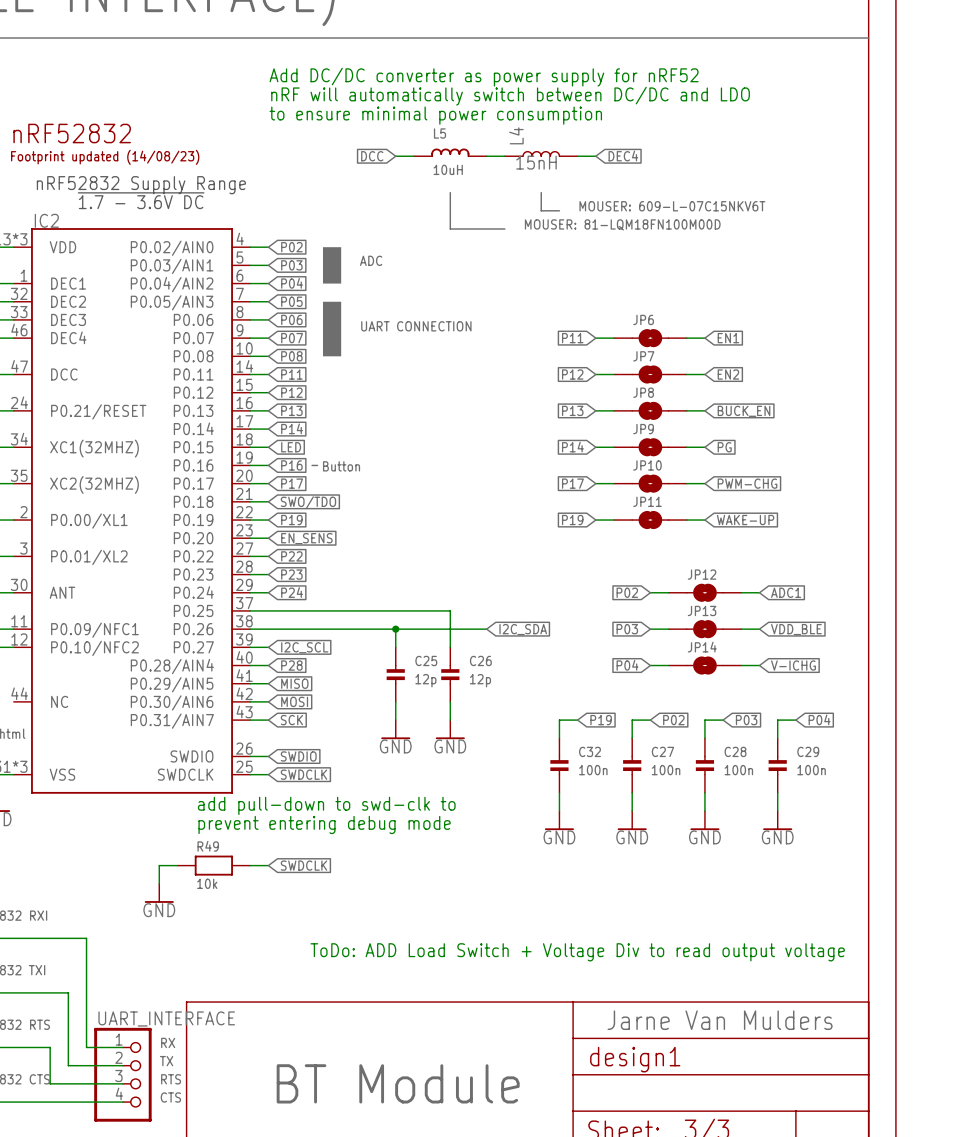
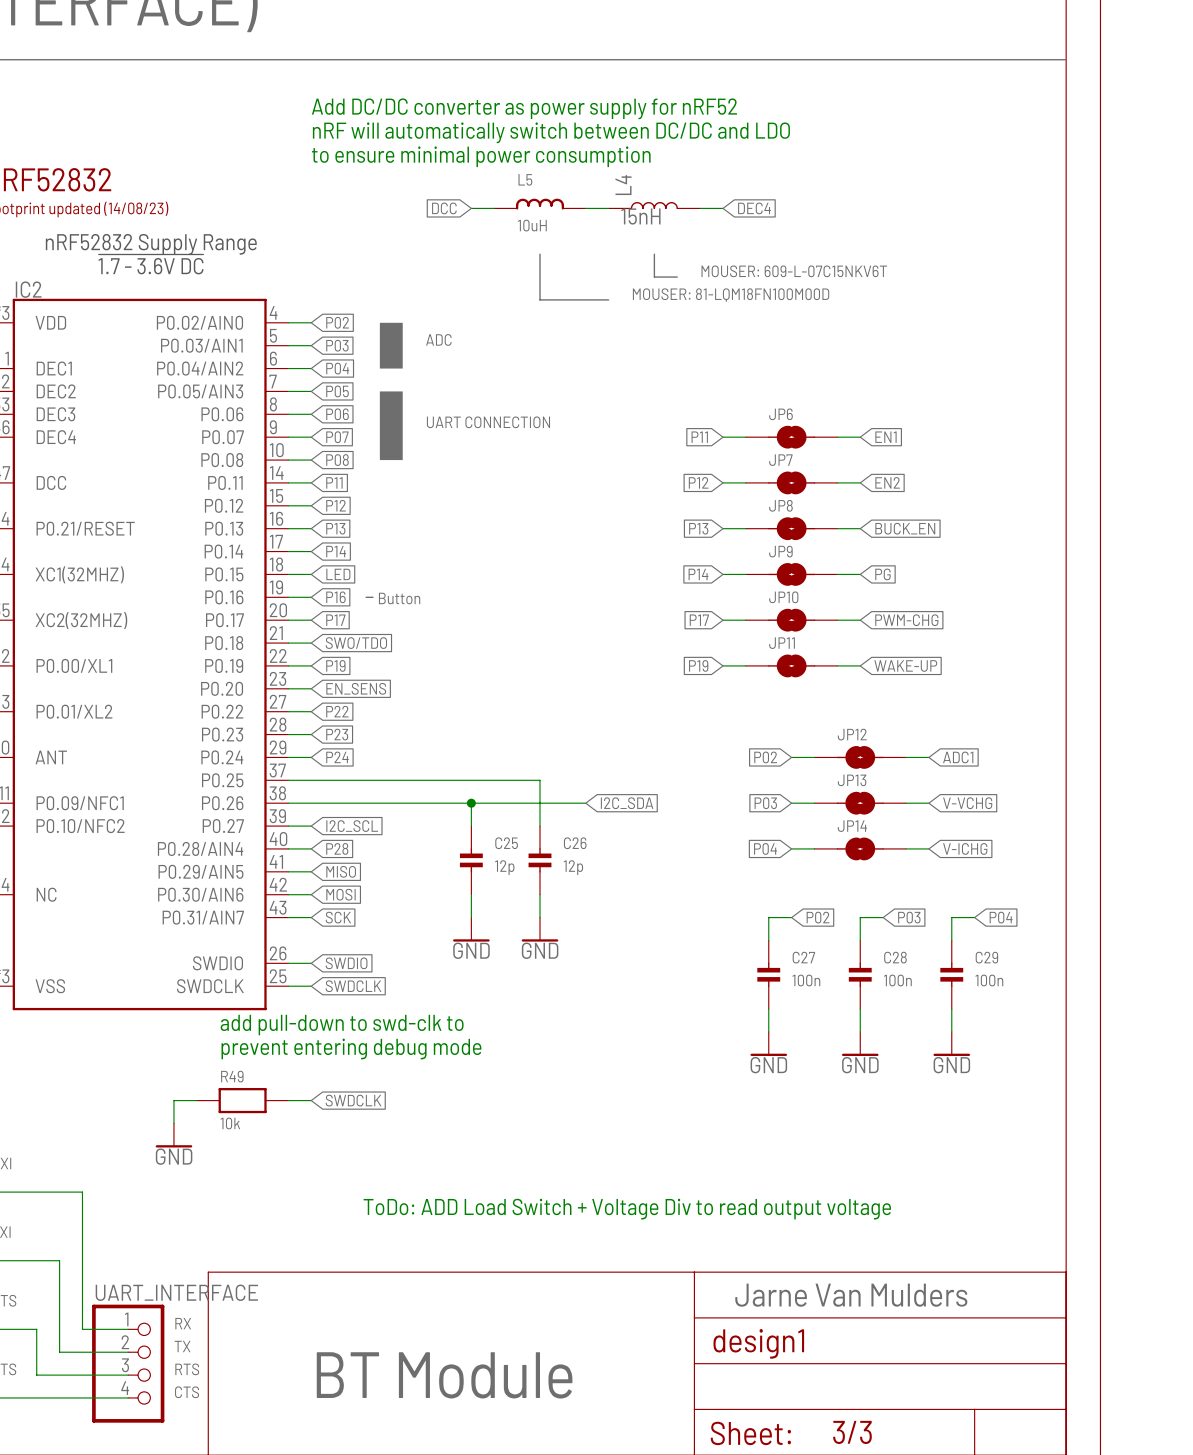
global label: VDD_BLE (796, 629) -> V-VCHG (967, 803)
wire: (577, 720) (559, 720) (559, 738) -> none
global label: P19 (601, 720) -> none
C32: 100n (559, 765) -> none
wire: (559, 792) (559, 811) -> none
power symbol: GND (559, 820) -> none

